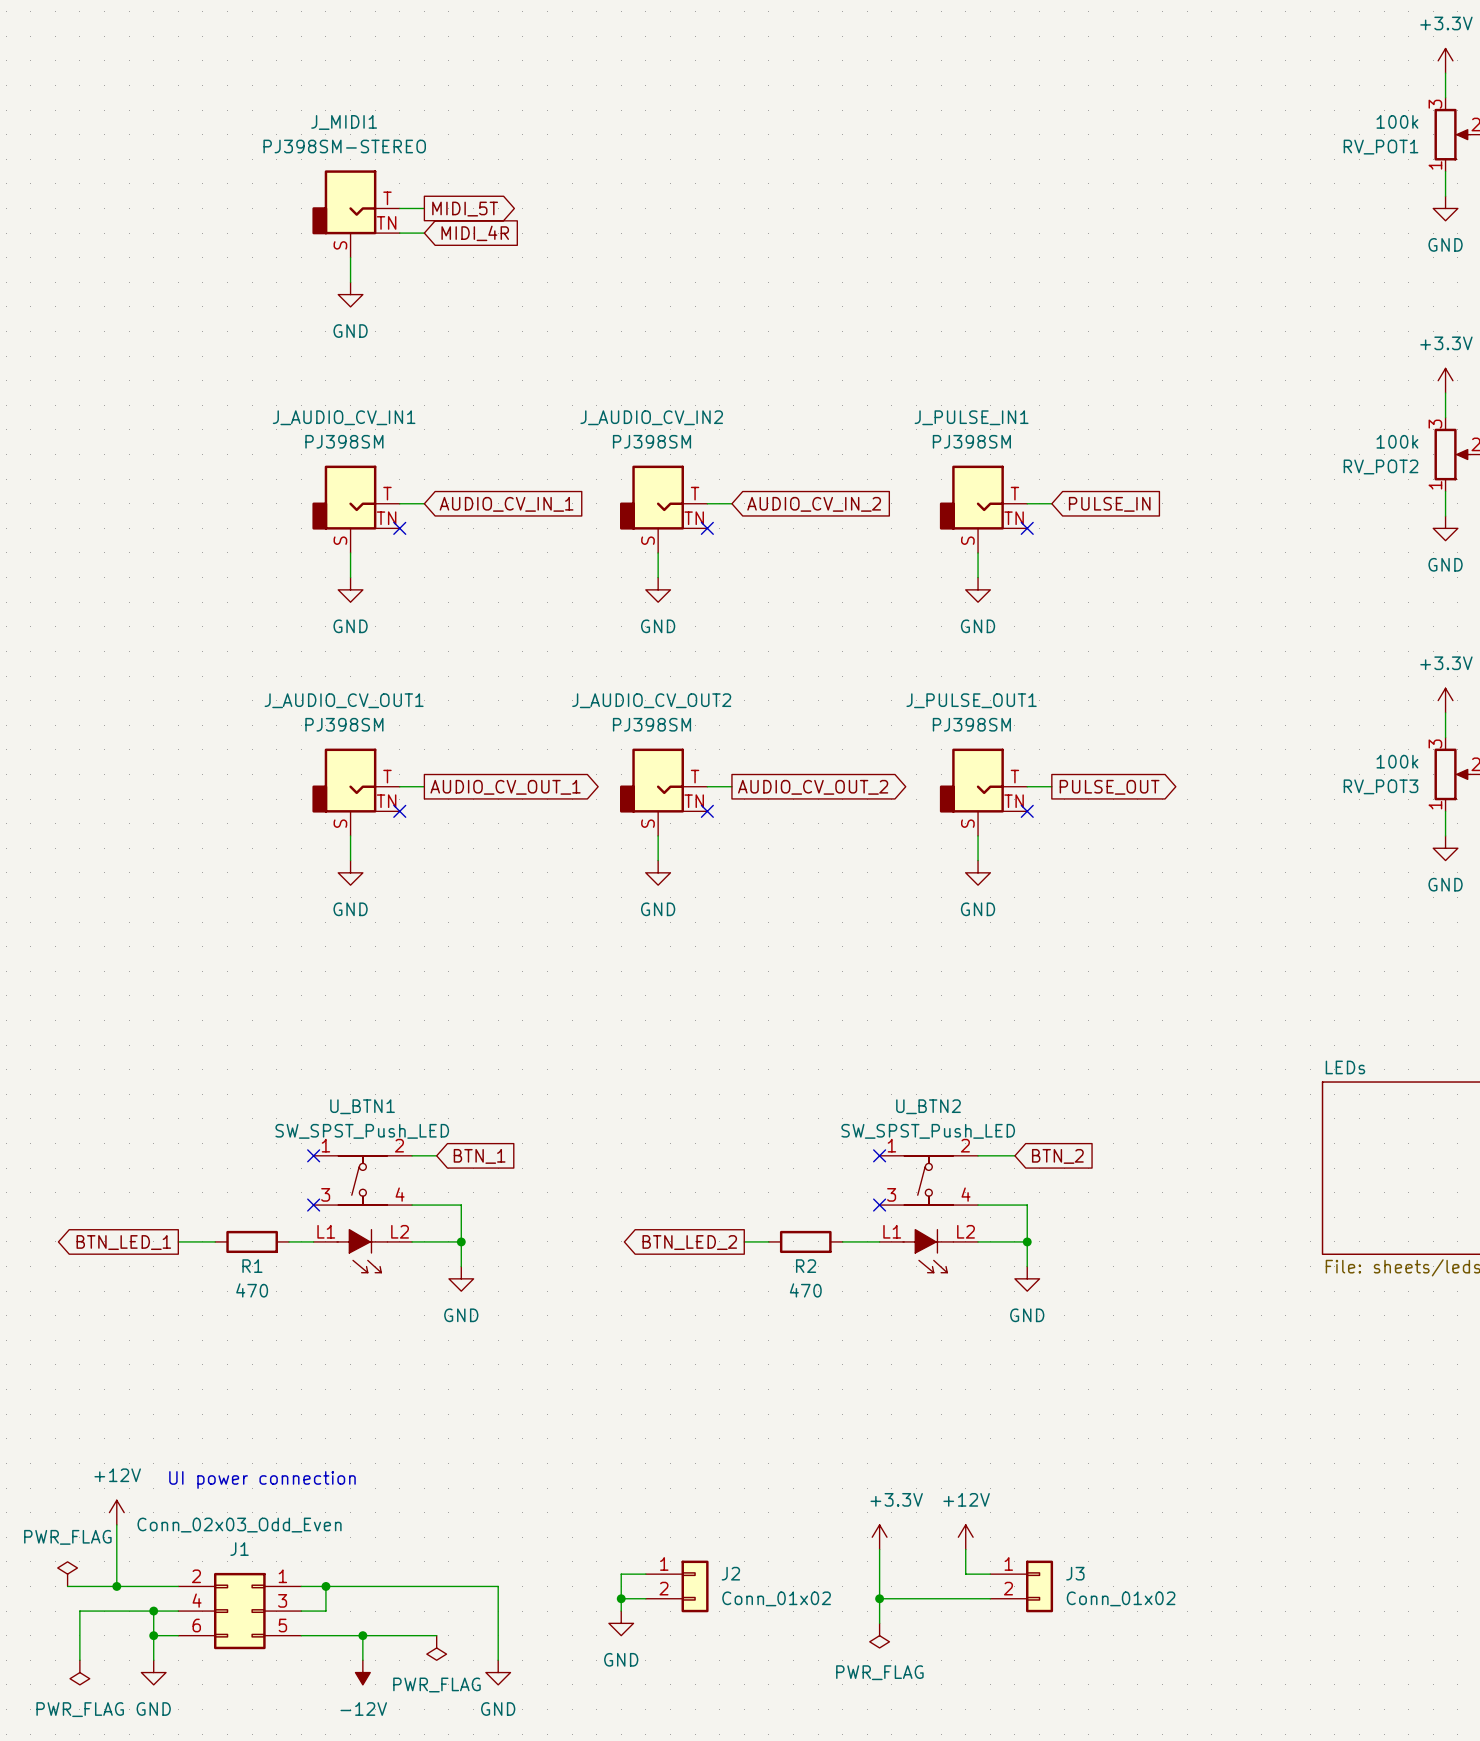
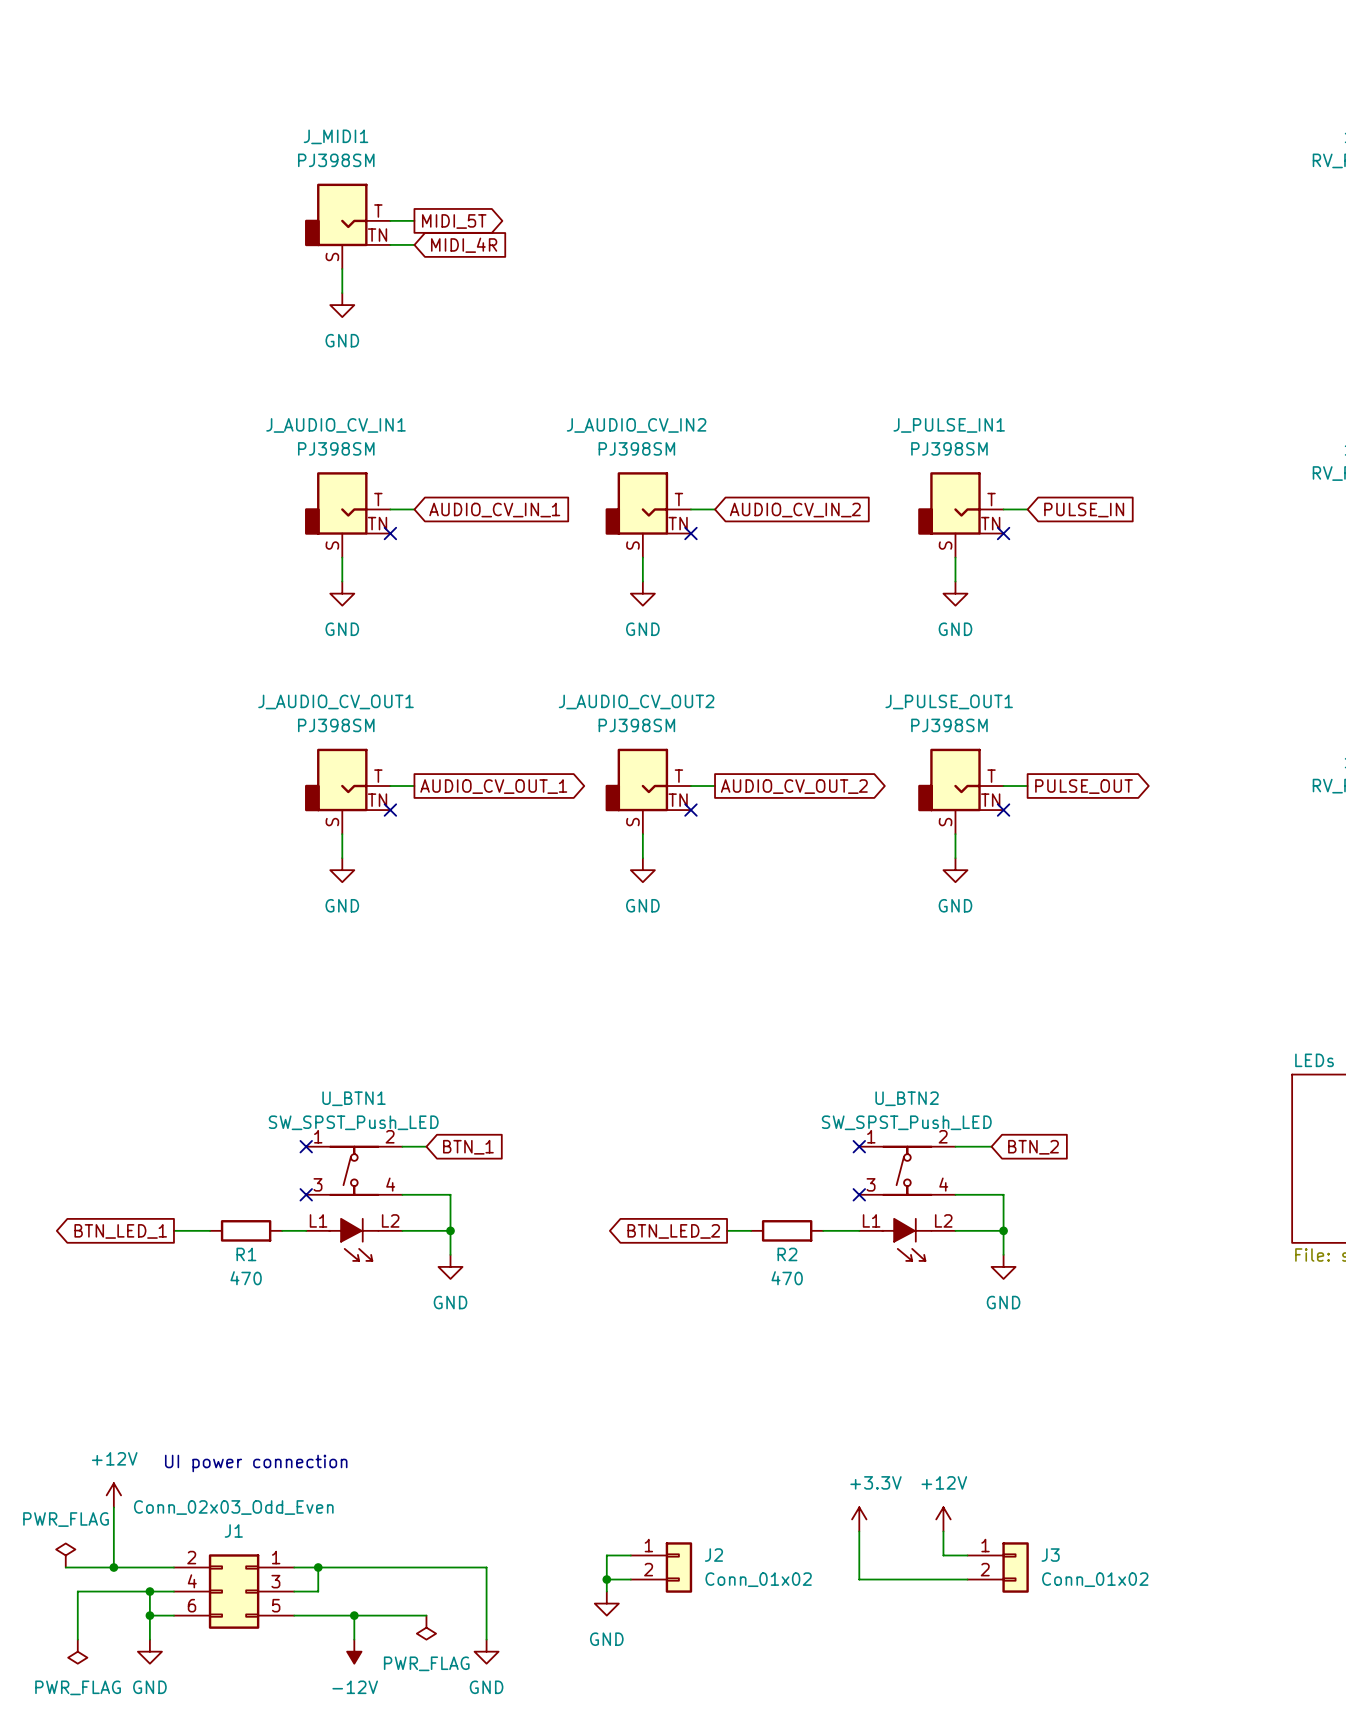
J_MIDI1 value: PJ398SM-STEREO (344, 146) -> PJ398SM (336, 160)
wire: (879, 1598) (879, 1623) -> none
junction: (879, 1598) -> none
power symbol: PWR_FLAG (879, 1635) -> none

